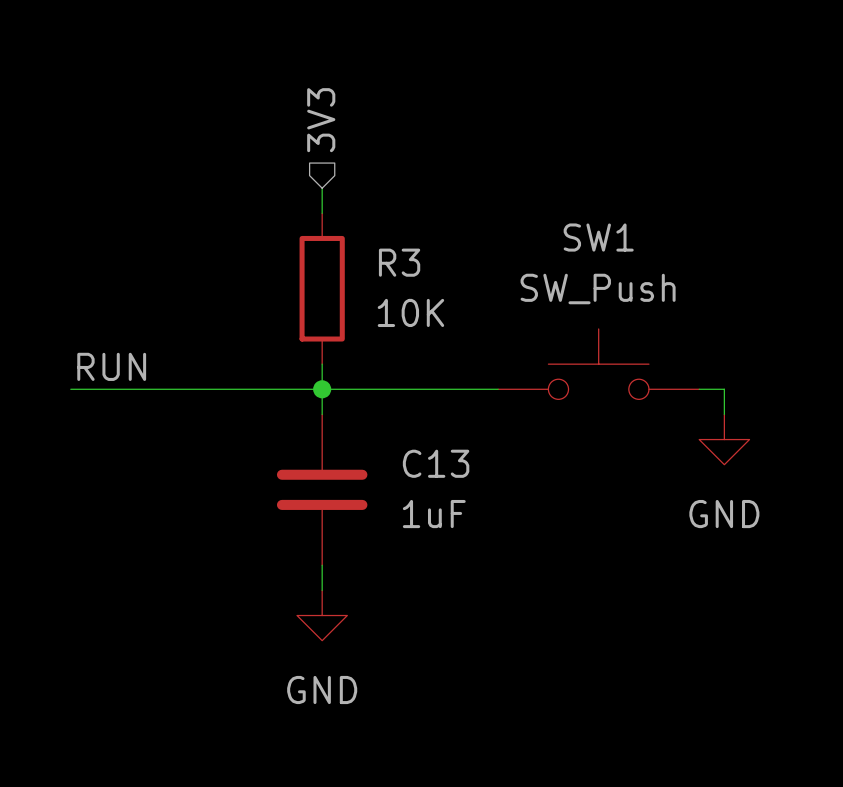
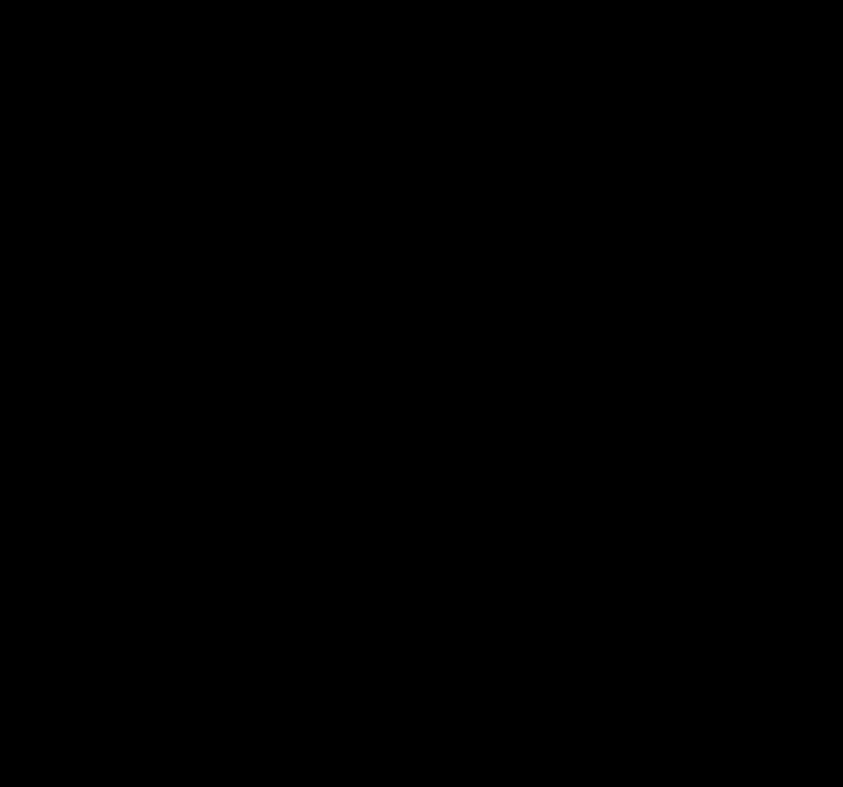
hierarchical label: 3V3 (321, 120) -> none
wire: (322, 188) (322, 213) -> none
R3: 10K (322, 288) -> none
wire: (322, 364) (322, 414) -> none
SW1: SW_Push (598, 364) -> none
label: RUN (111, 366) -> none
wire: (70, 389) (498, 389) -> none
junction: (322, 389) -> none
wire: (699, 389) (724, 389) (724, 414) -> none
power symbol: GND (724, 439) -> none
C13: 1uF (322, 489) -> none
wire: (322, 565) (322, 590) -> none
power symbol: GND (322, 615) -> none

